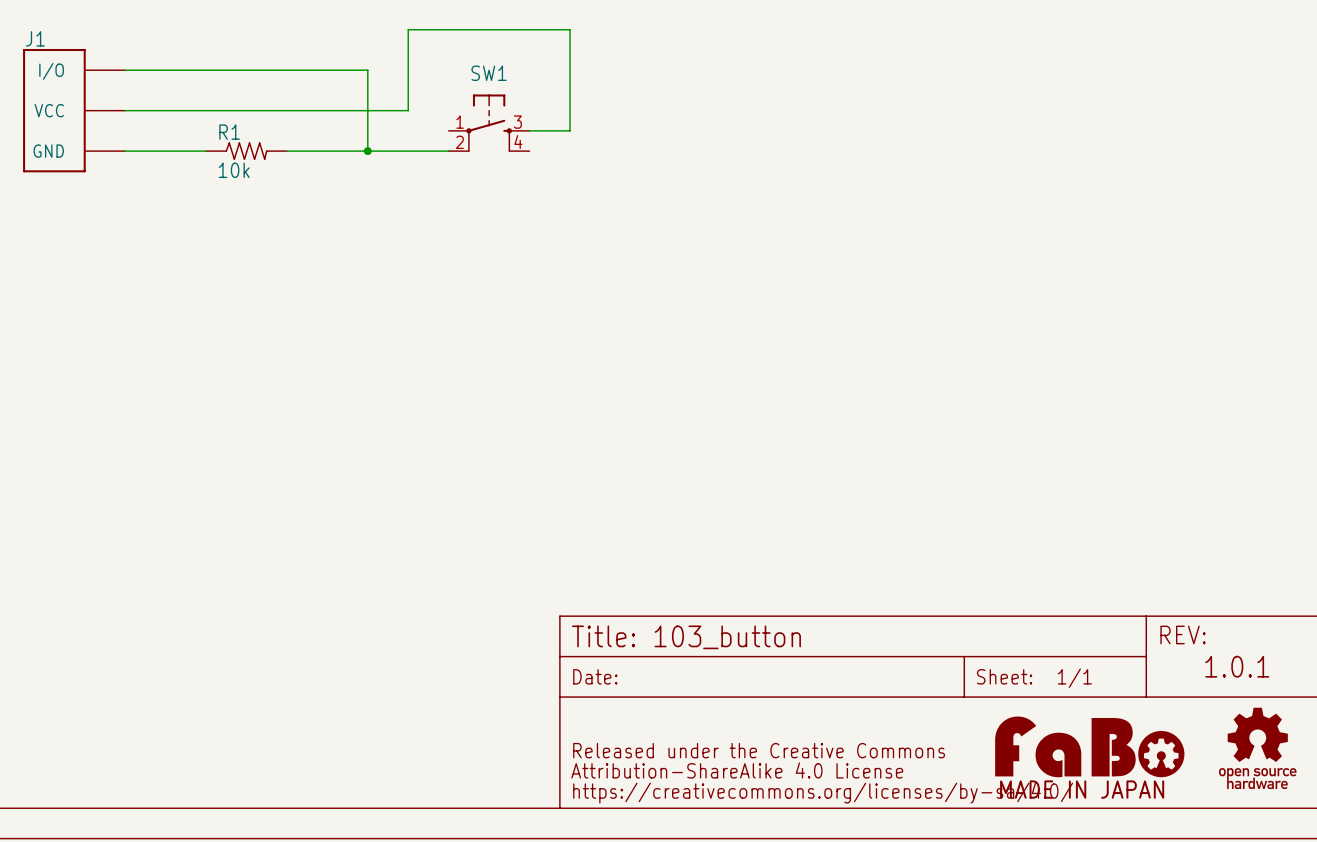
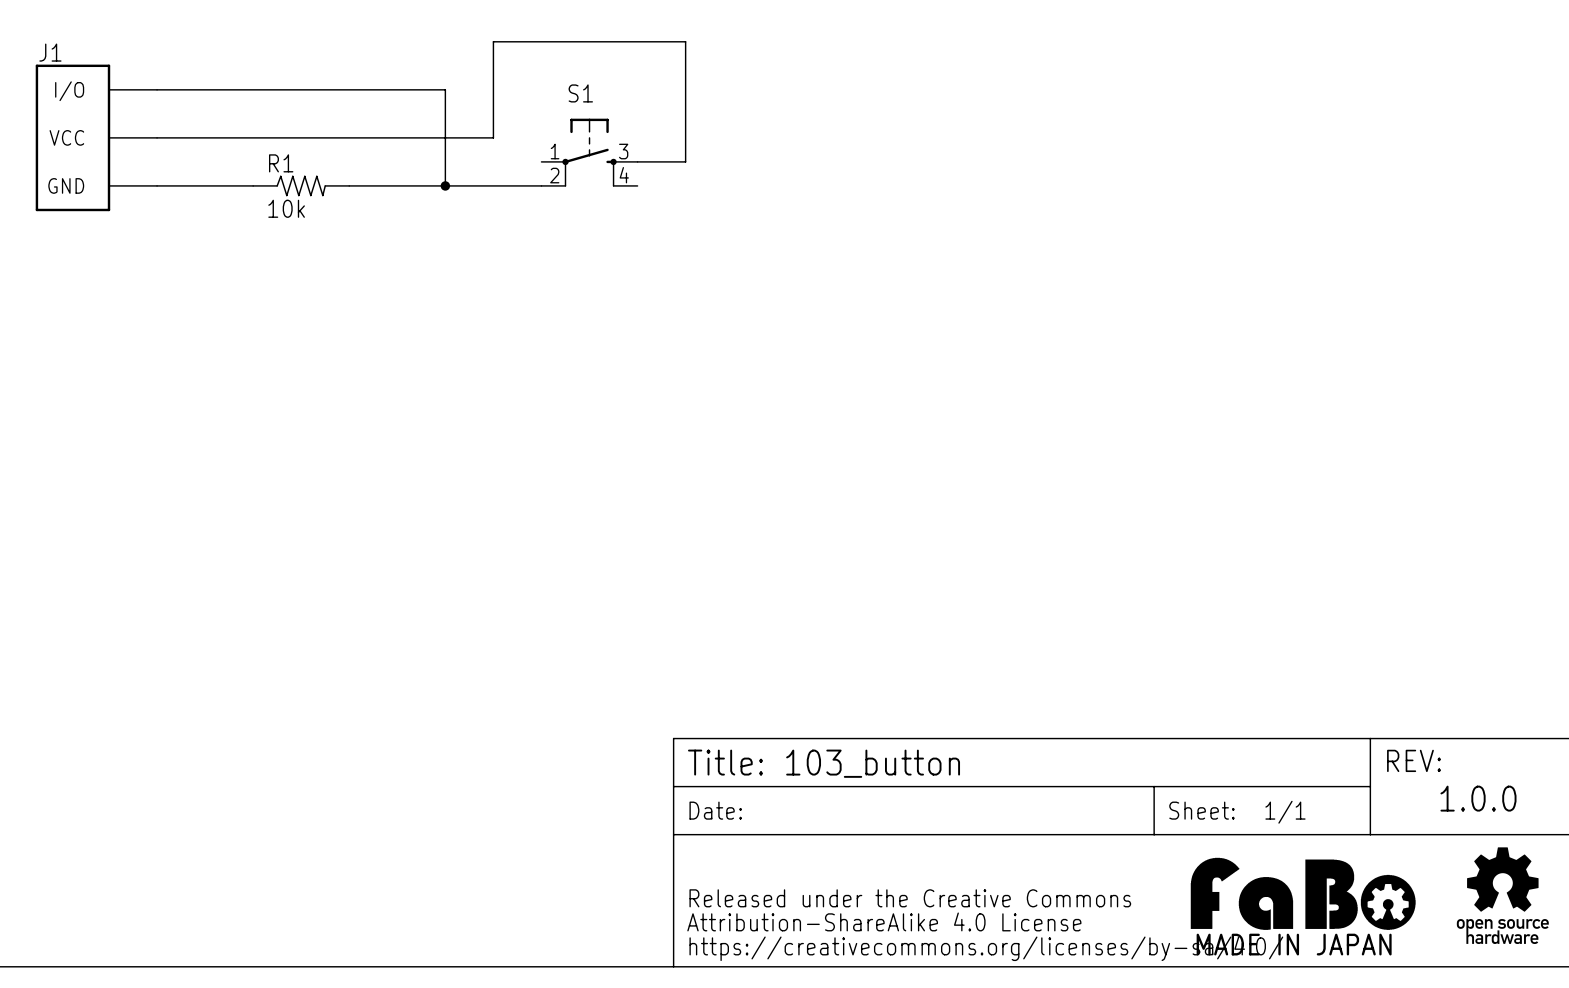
SW1 name: SW1 (489, 73) -> S1 (580, 93)
text: 1.0.1 (1237, 666) -> 1.0.0 (1478, 798)

